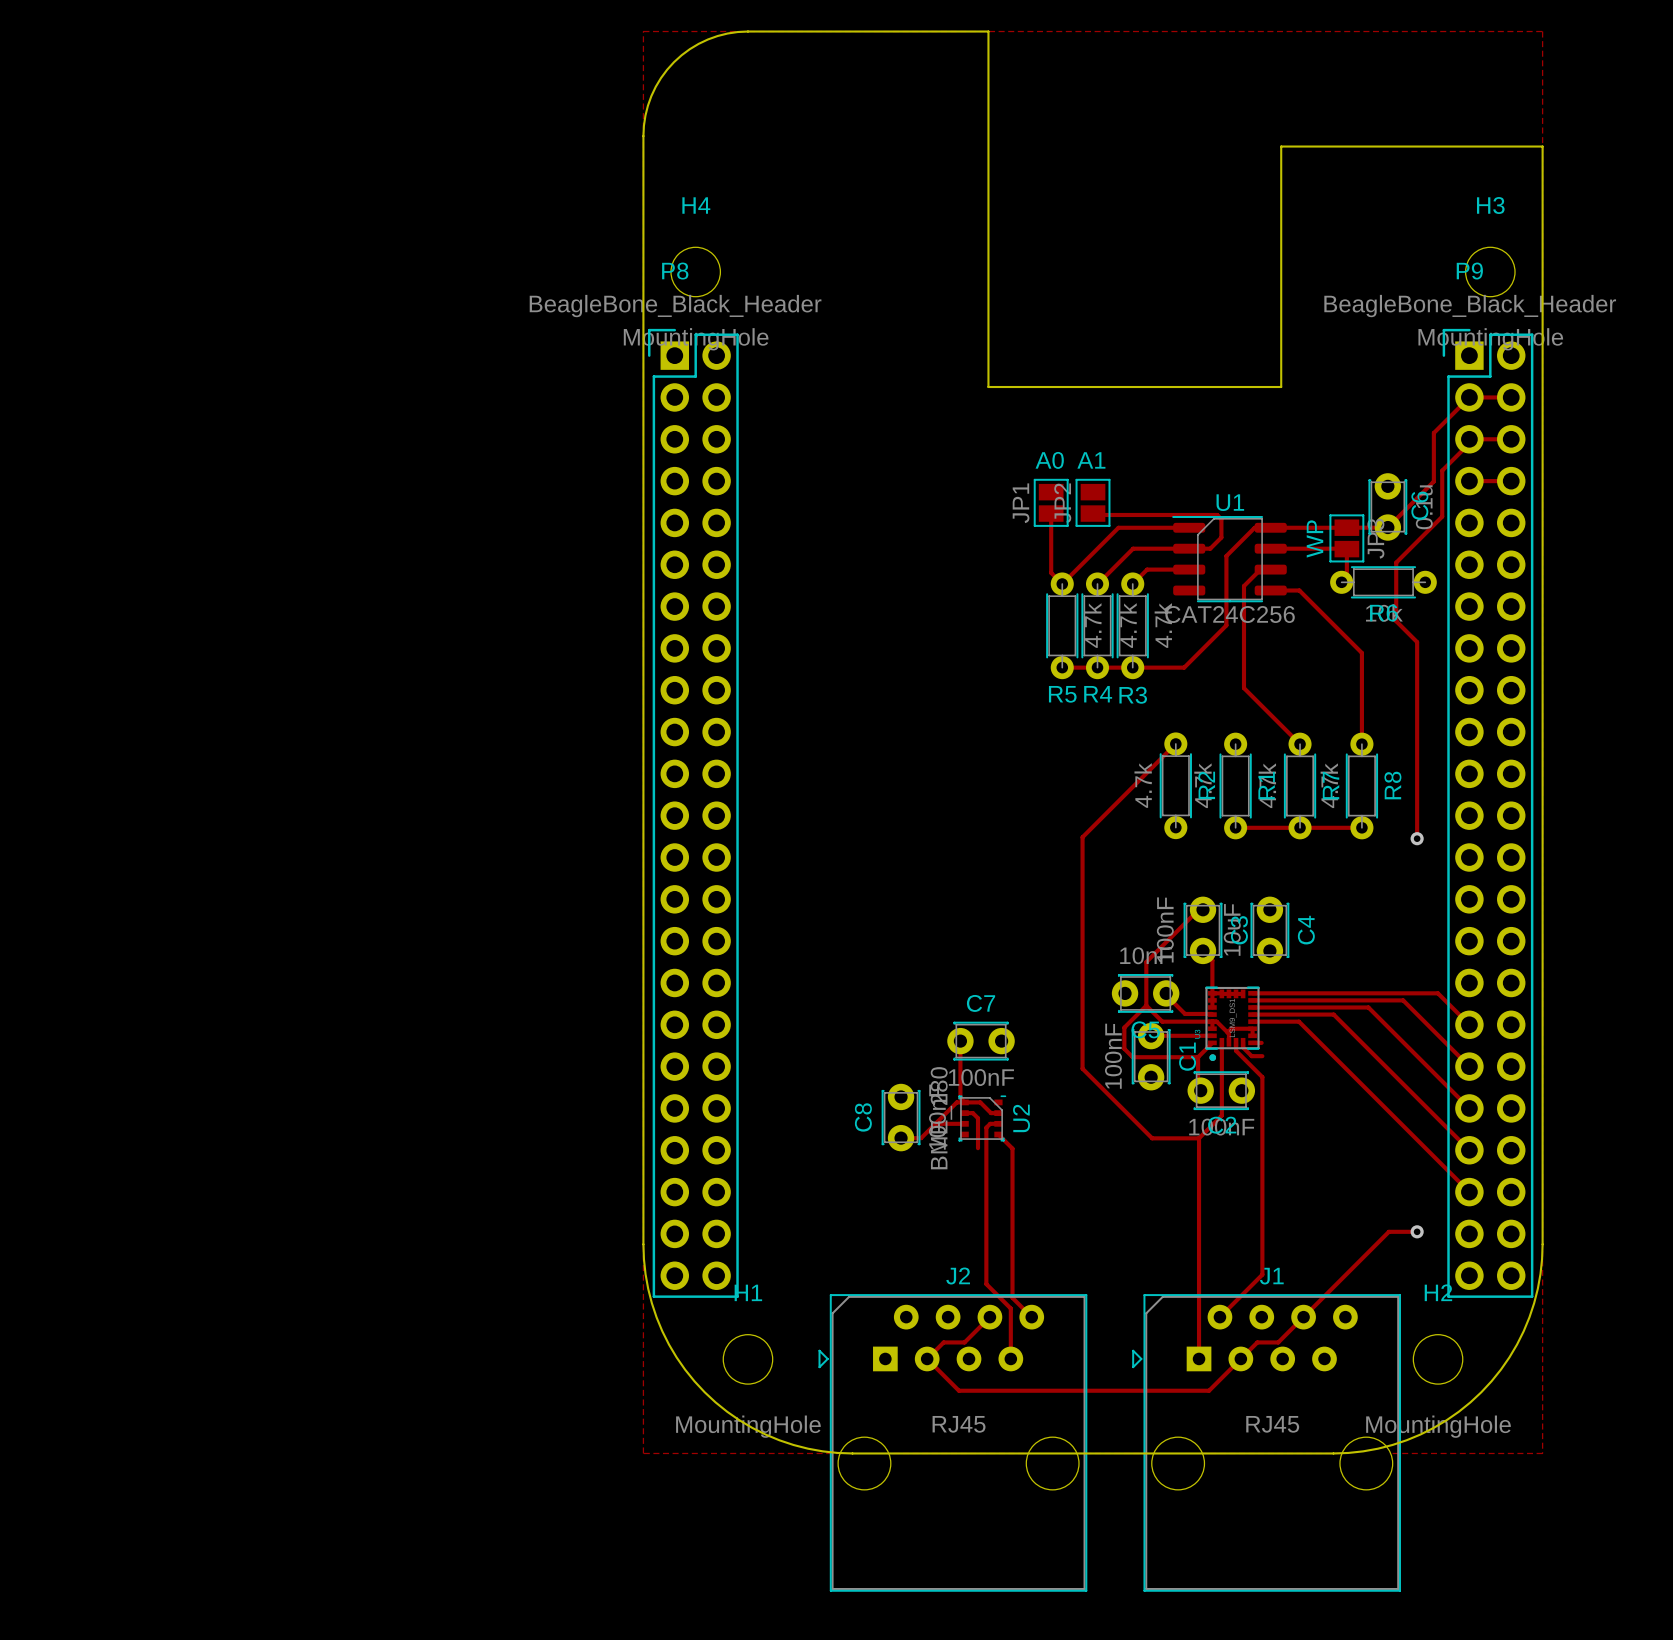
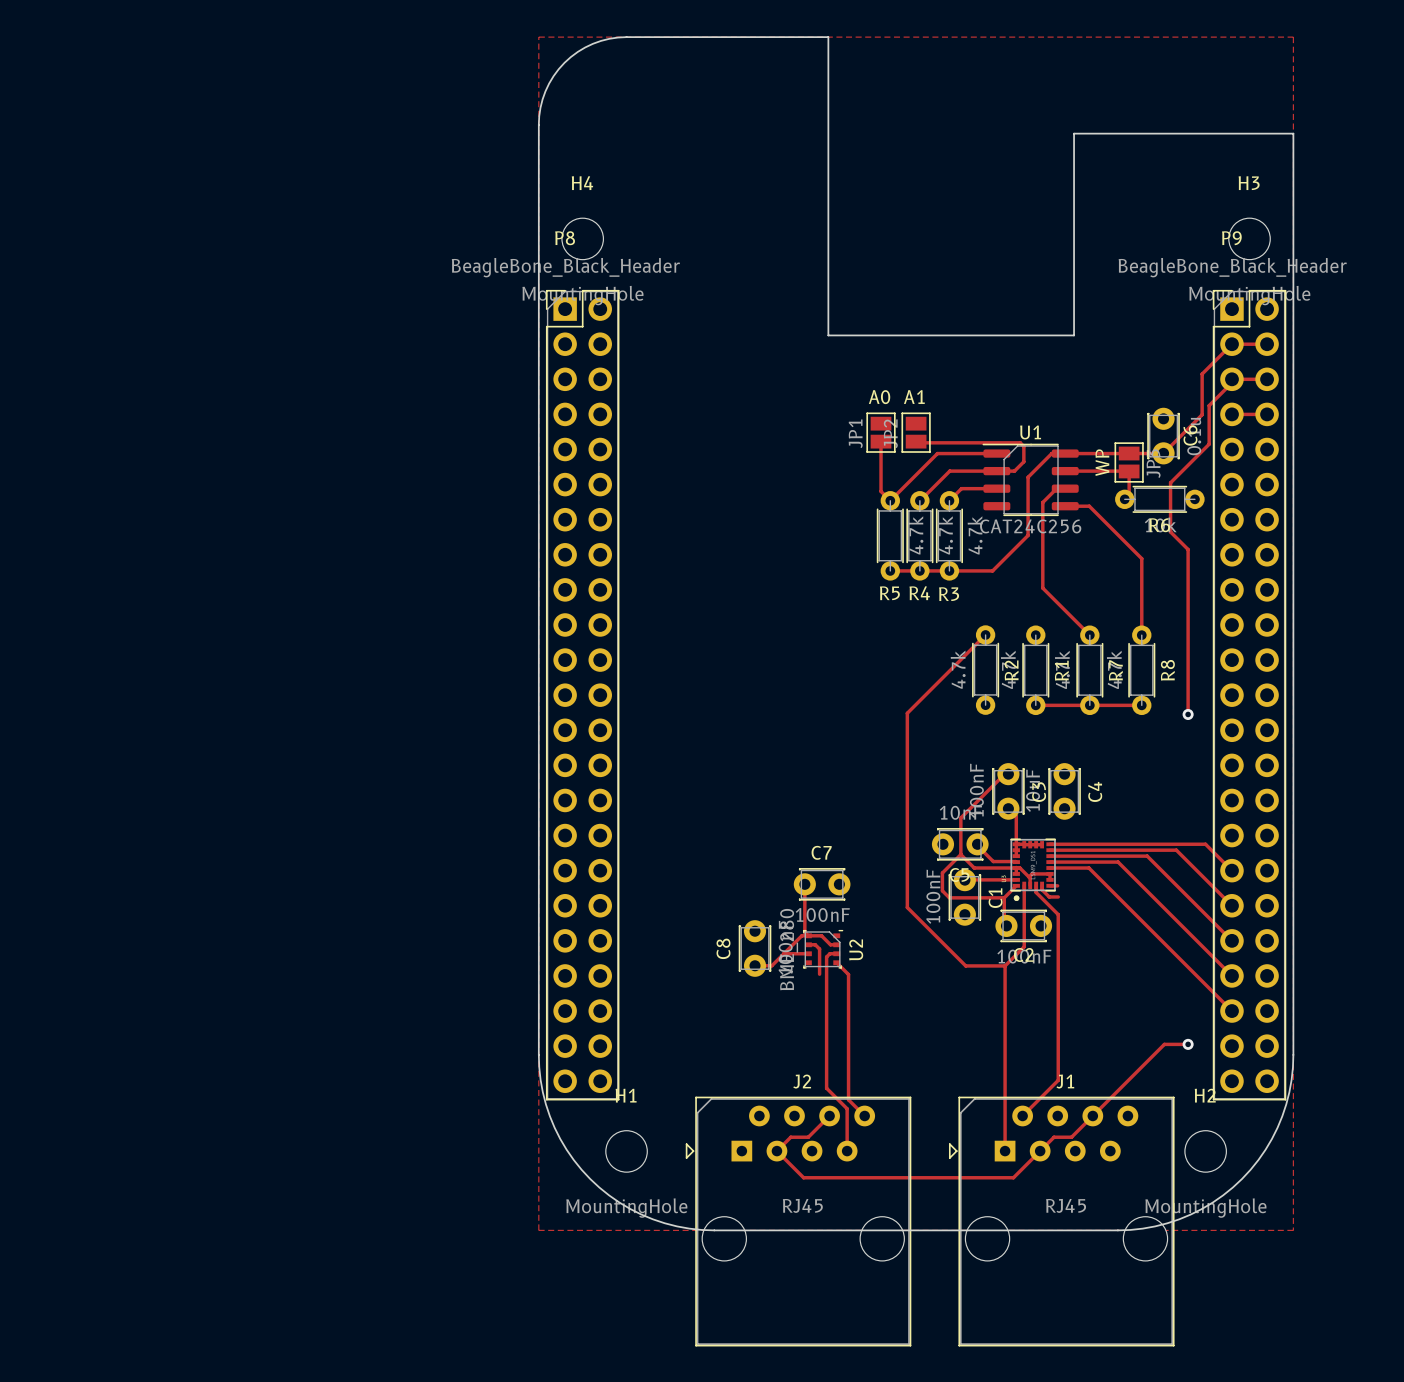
P8 footprint: [648, 328, 739, 1298] -> [545, 289, 620, 1101]
P9 footprint: [1442, 328, 1534, 1298] -> [1212, 289, 1287, 1101]

